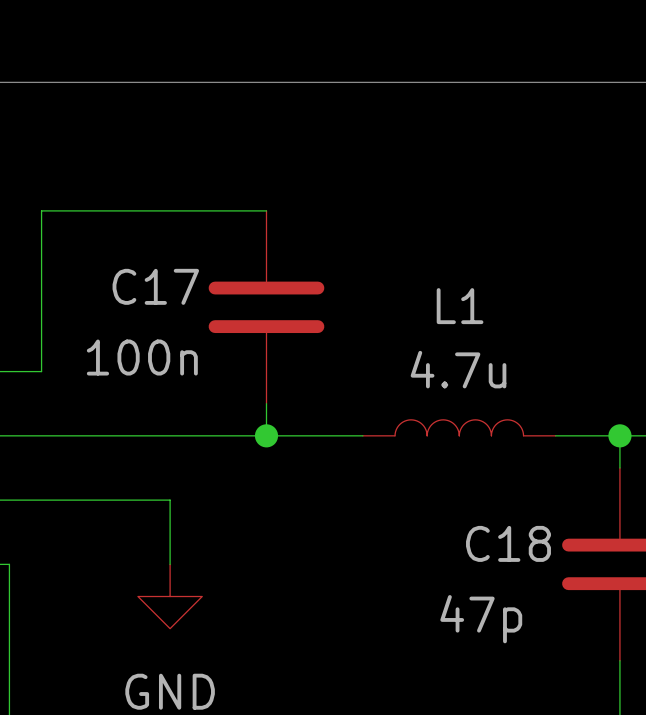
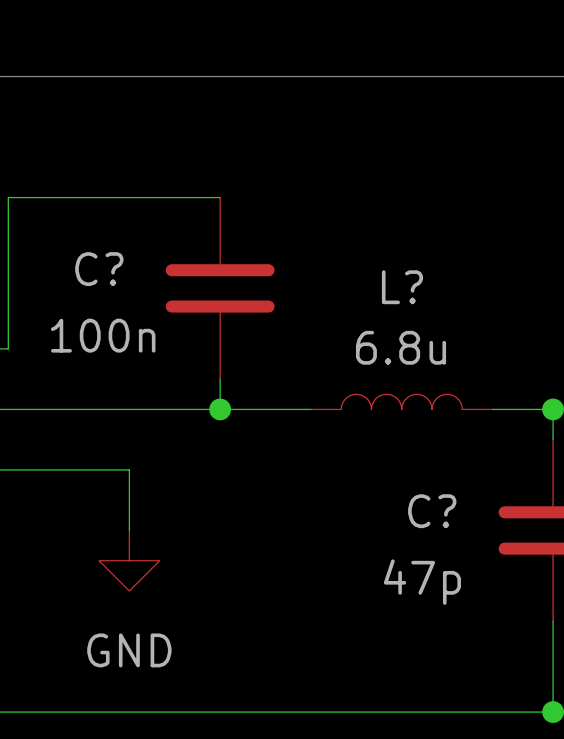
C17 name: C17 (155, 286) -> C? (99, 269)
L1 name: L1 (460, 306) -> L? (402, 287)
L1 value: 4.7u (458, 369) -> 6.8u (401, 347)
C18 name: C18 (508, 543) -> C? (432, 511)

